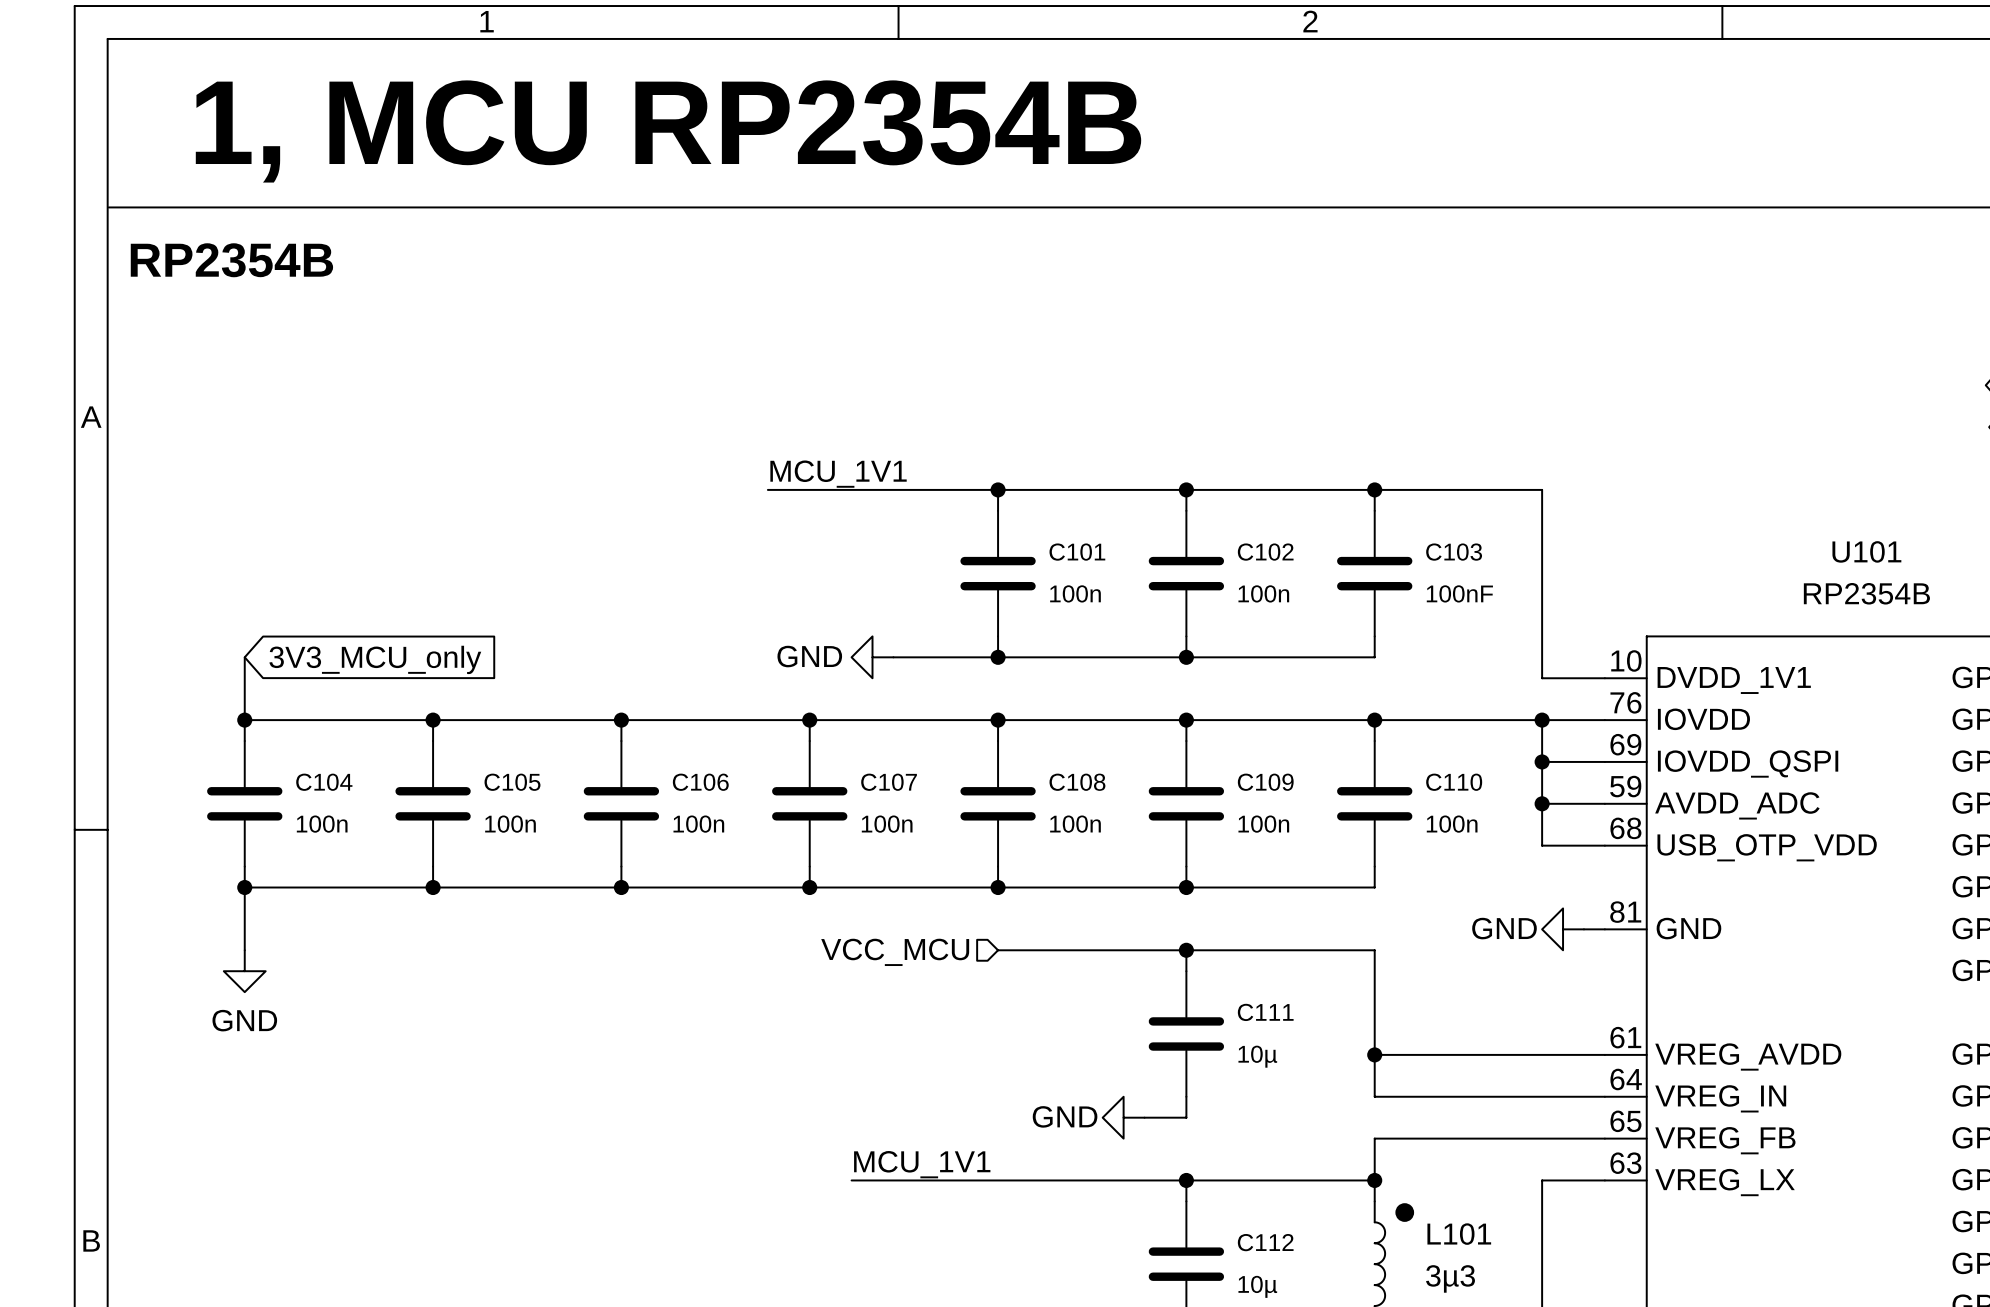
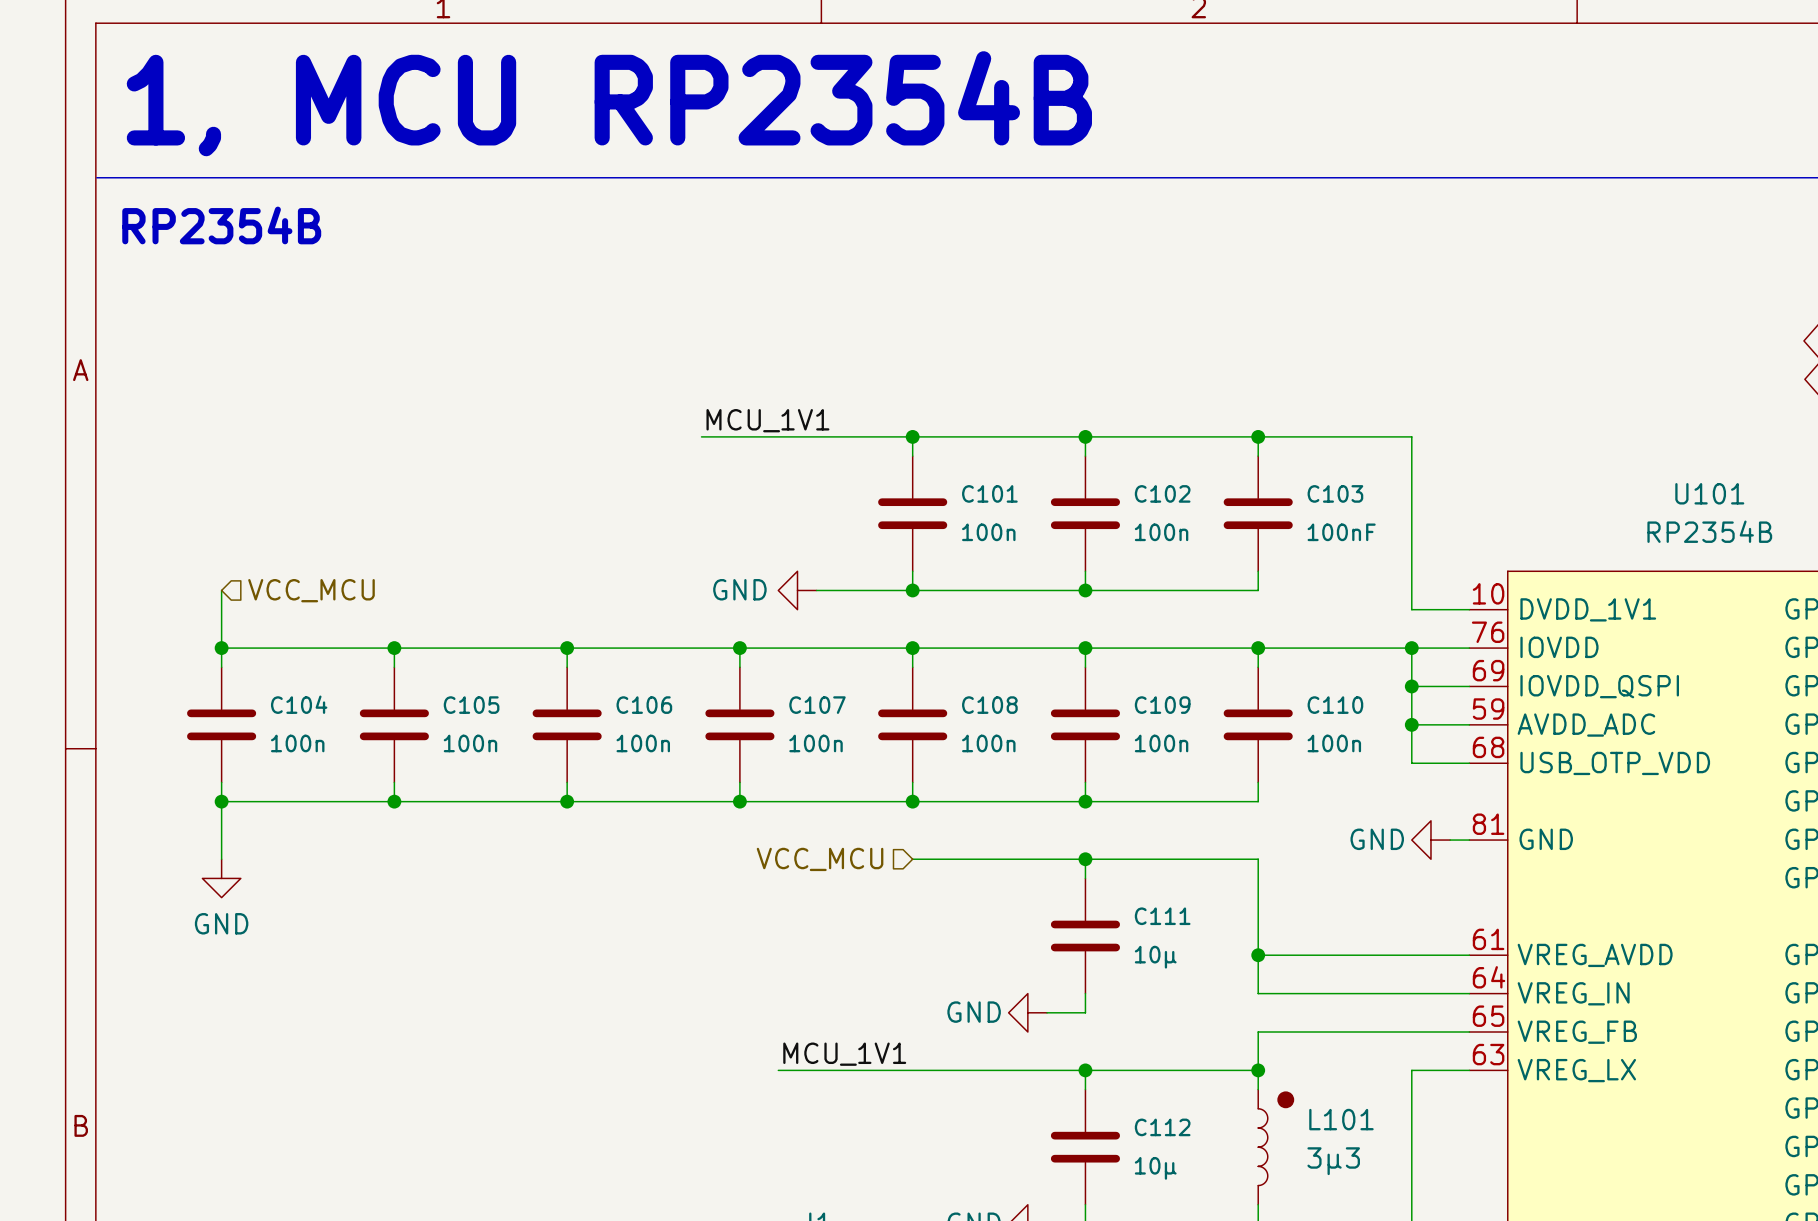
hierarchical label: none -> VCC_MCU (311, 590)
global label: 3V3_MCU_only (375, 659) -> none

